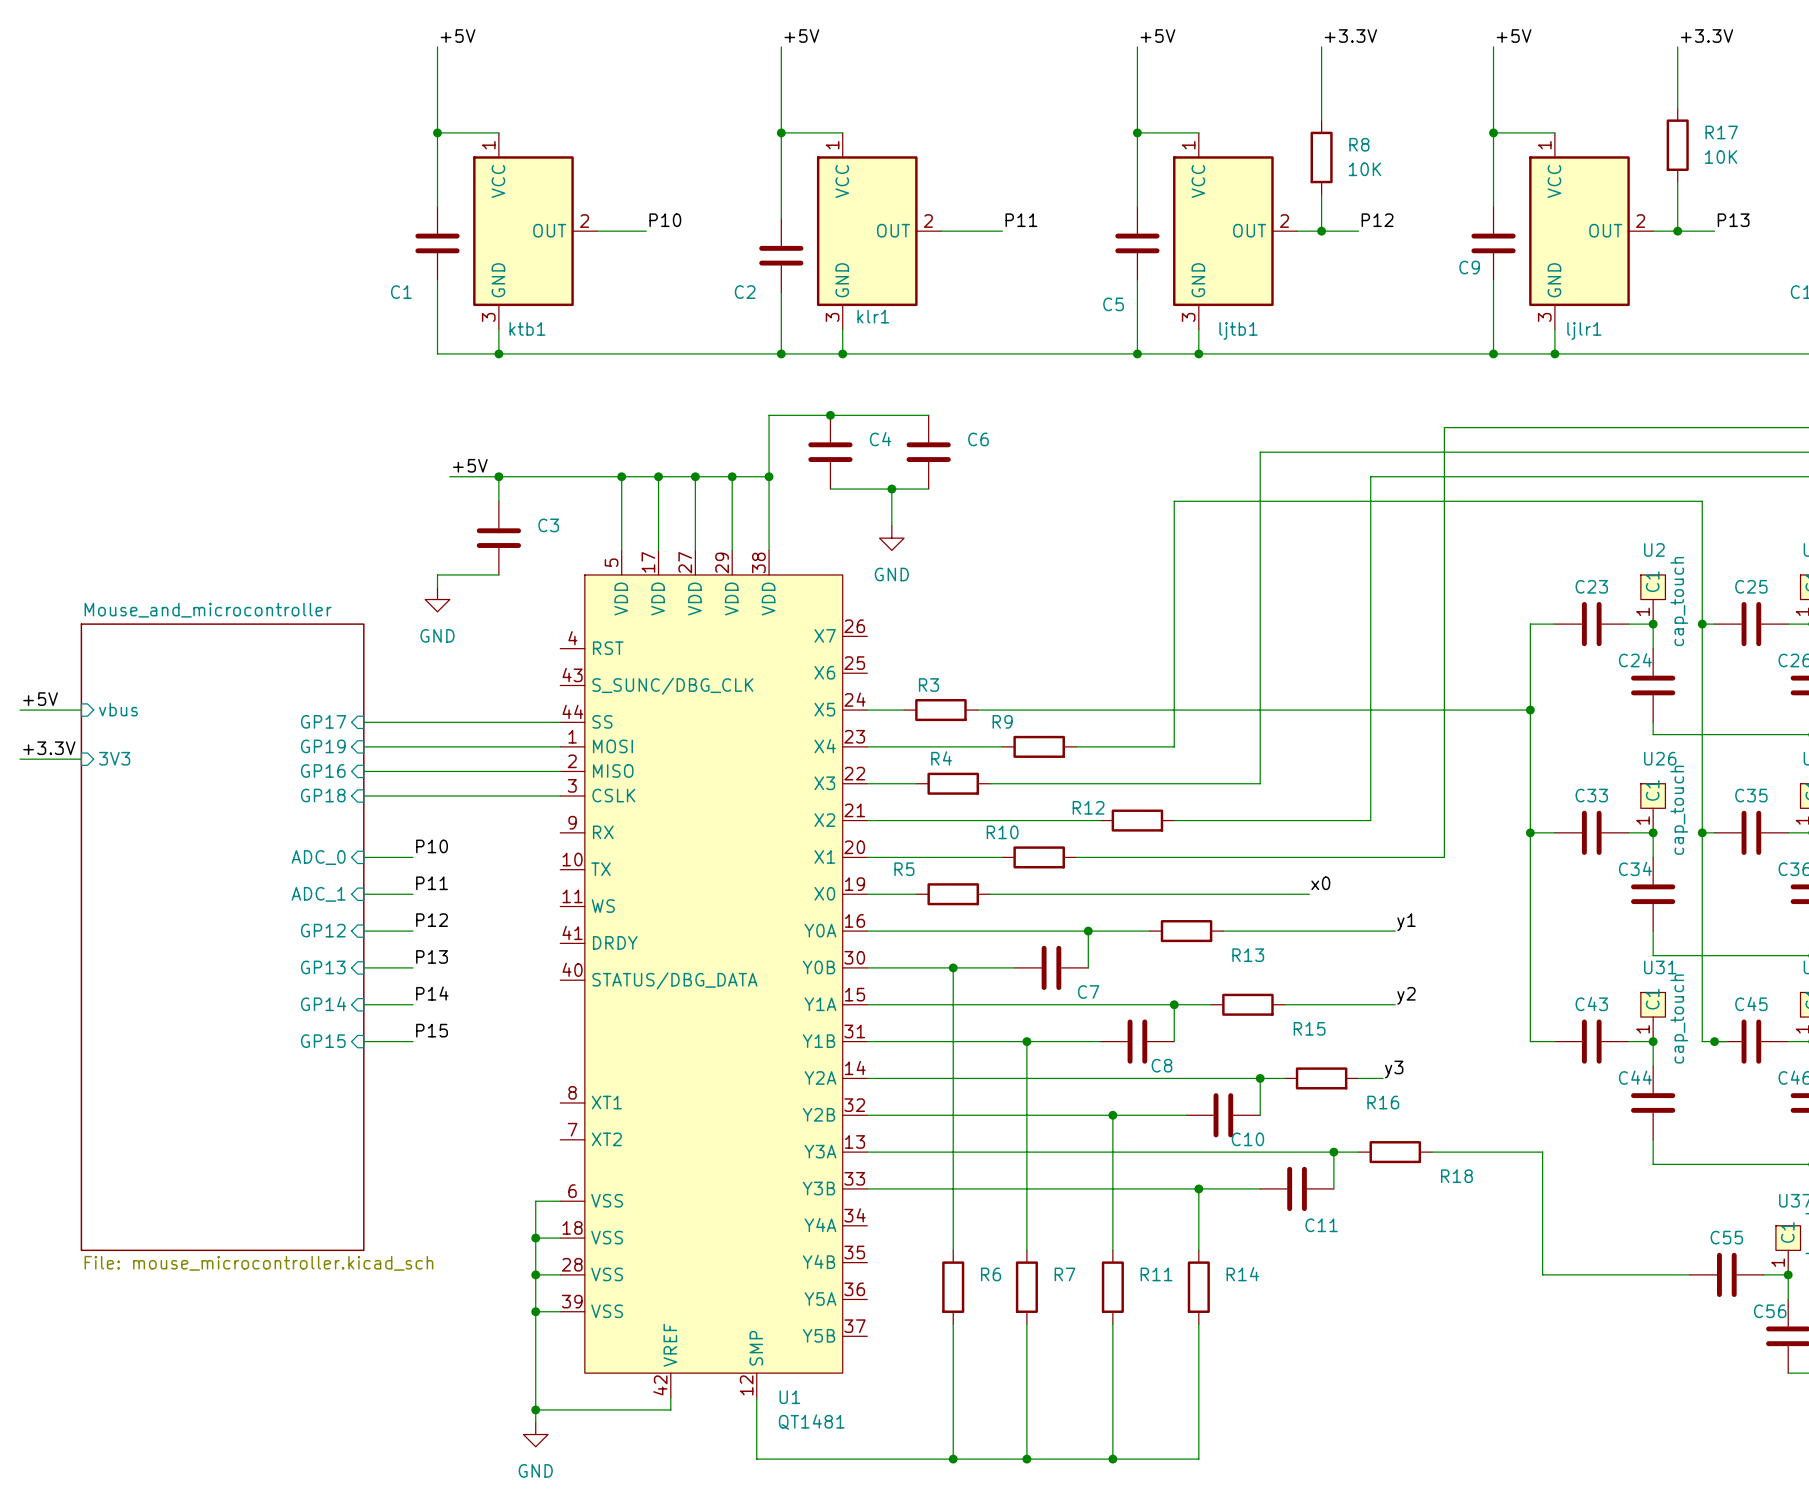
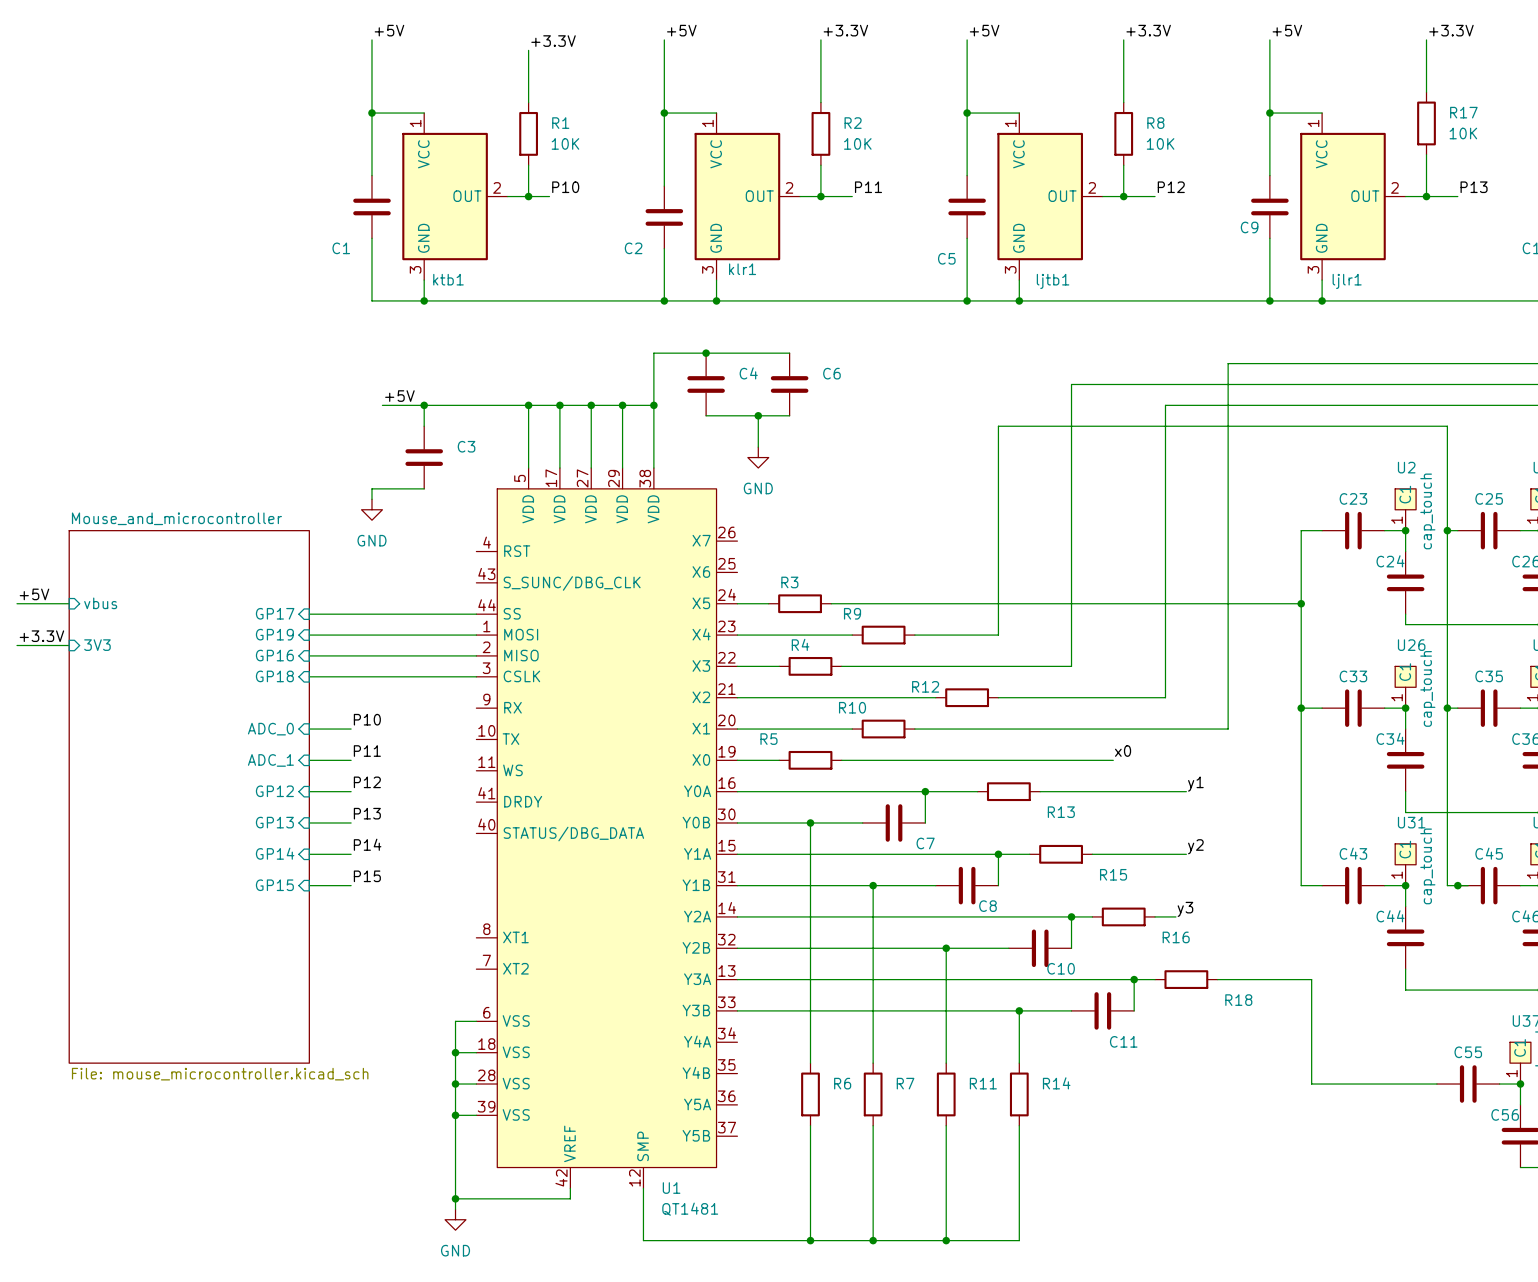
label: none -> +3.3V (845, 30)
wire: none -> (820, 39) (820, 102)
label: none -> +3.3V (553, 41)
wire: none -> (528, 50) (528, 102)
R1: none -> 10K (528, 133)
R2: none -> 10K (820, 133)
wire: none -> (528, 165) (528, 196)
wire: none -> (820, 165) (820, 196)
junction: none -> (528, 196)
junction: none -> (820, 196)

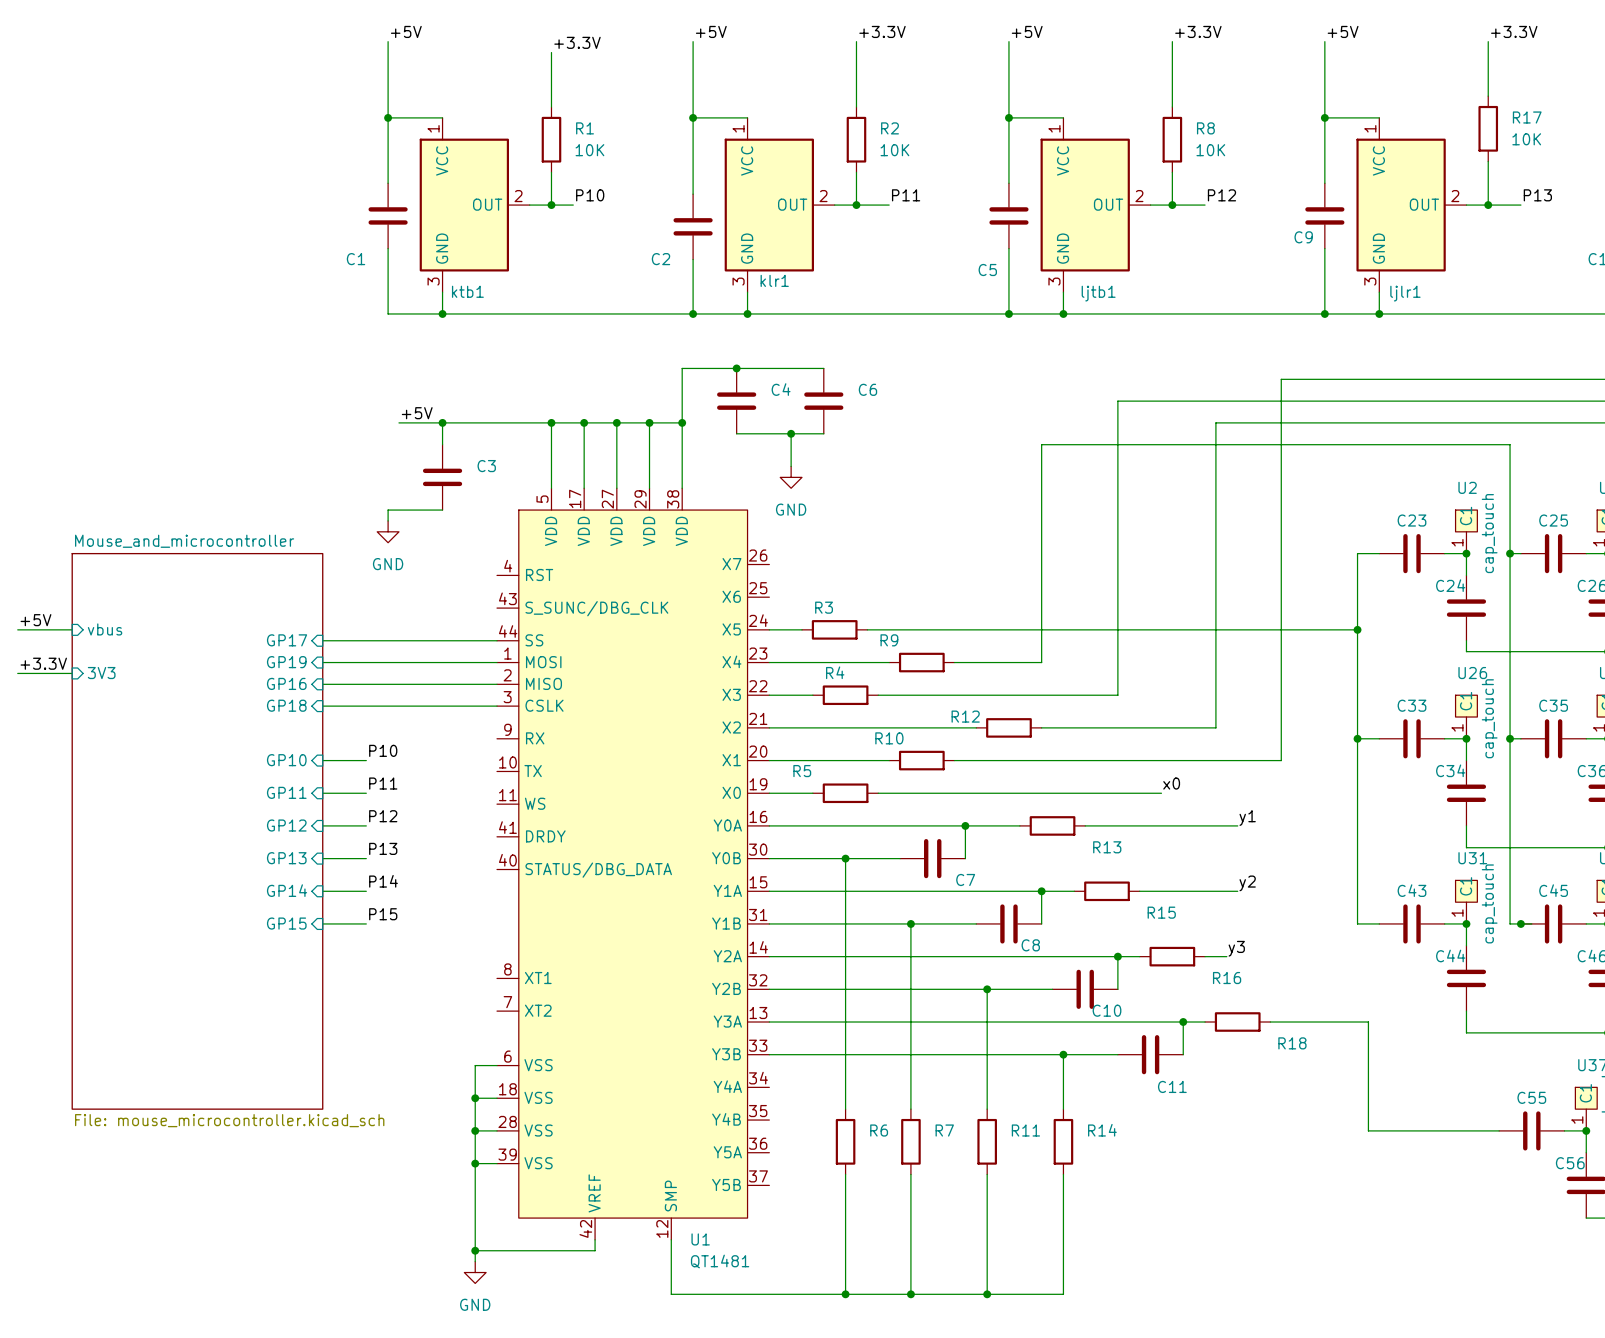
sheet pin: ADC_0 (270, 729) -> GP10 (286, 760)
sheet pin: ADC_1 (270, 760) -> GP11 (286, 792)

